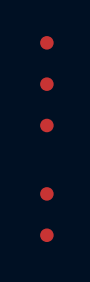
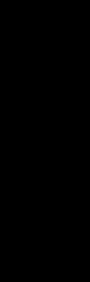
part: (46, 42) -> none
part: (46, 84) -> none
part: (46, 125) -> none
part: (46, 193) -> none
part: (46, 235) -> none

